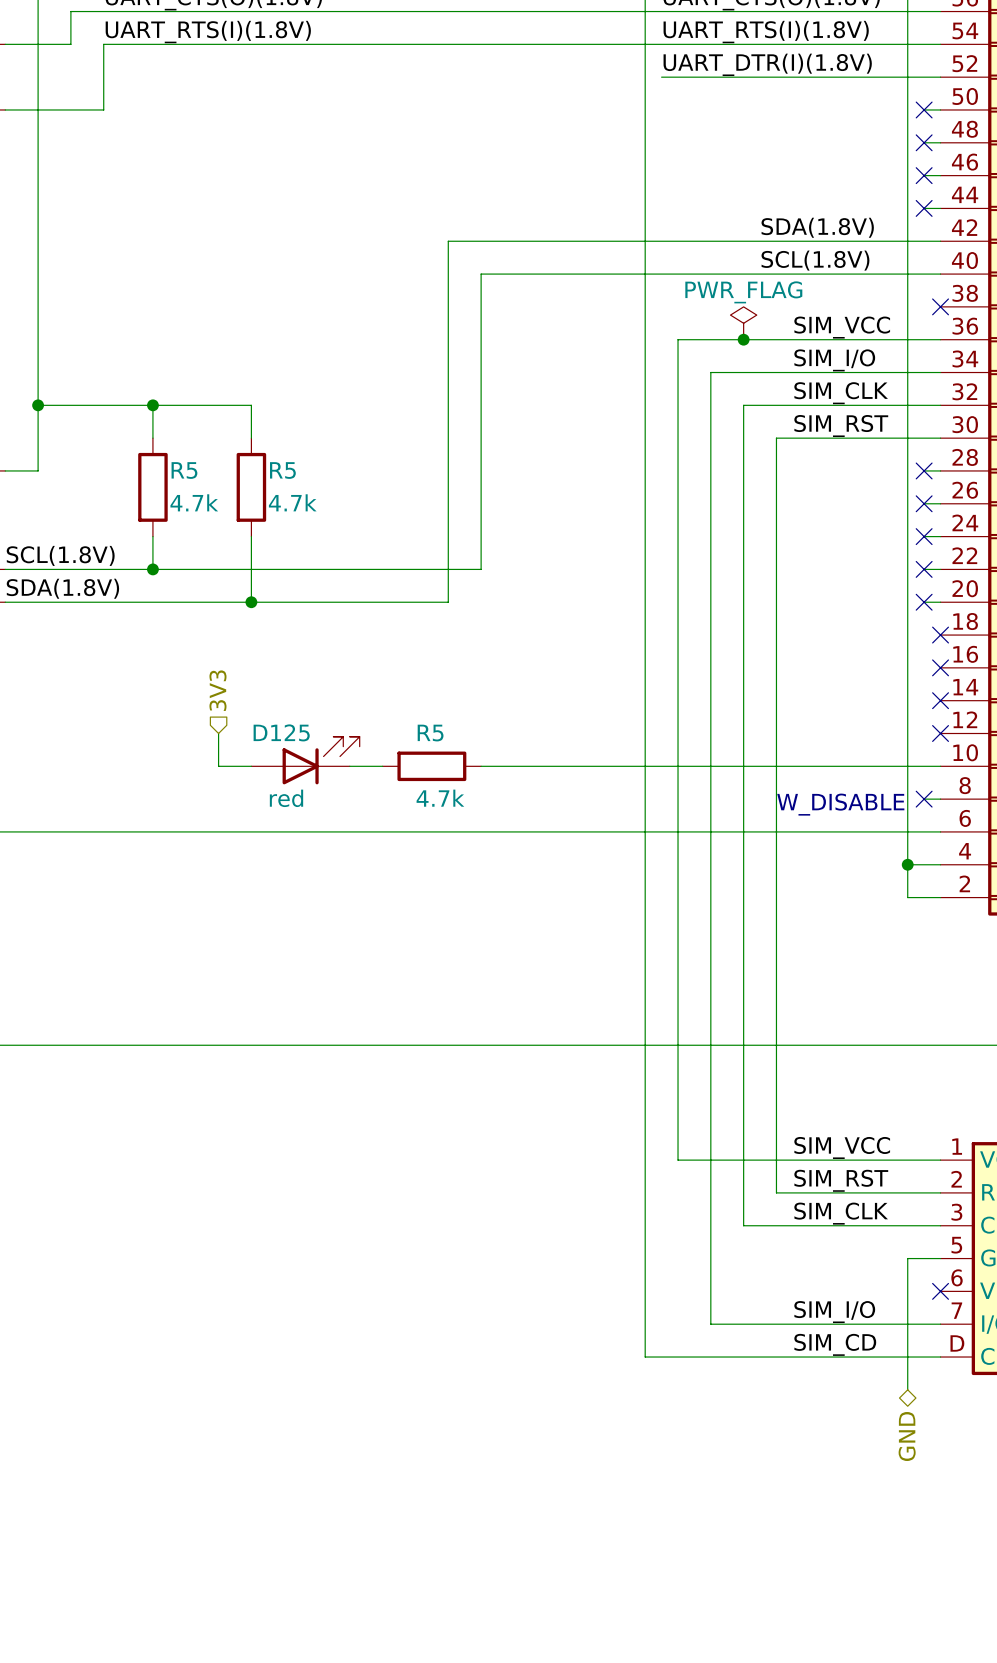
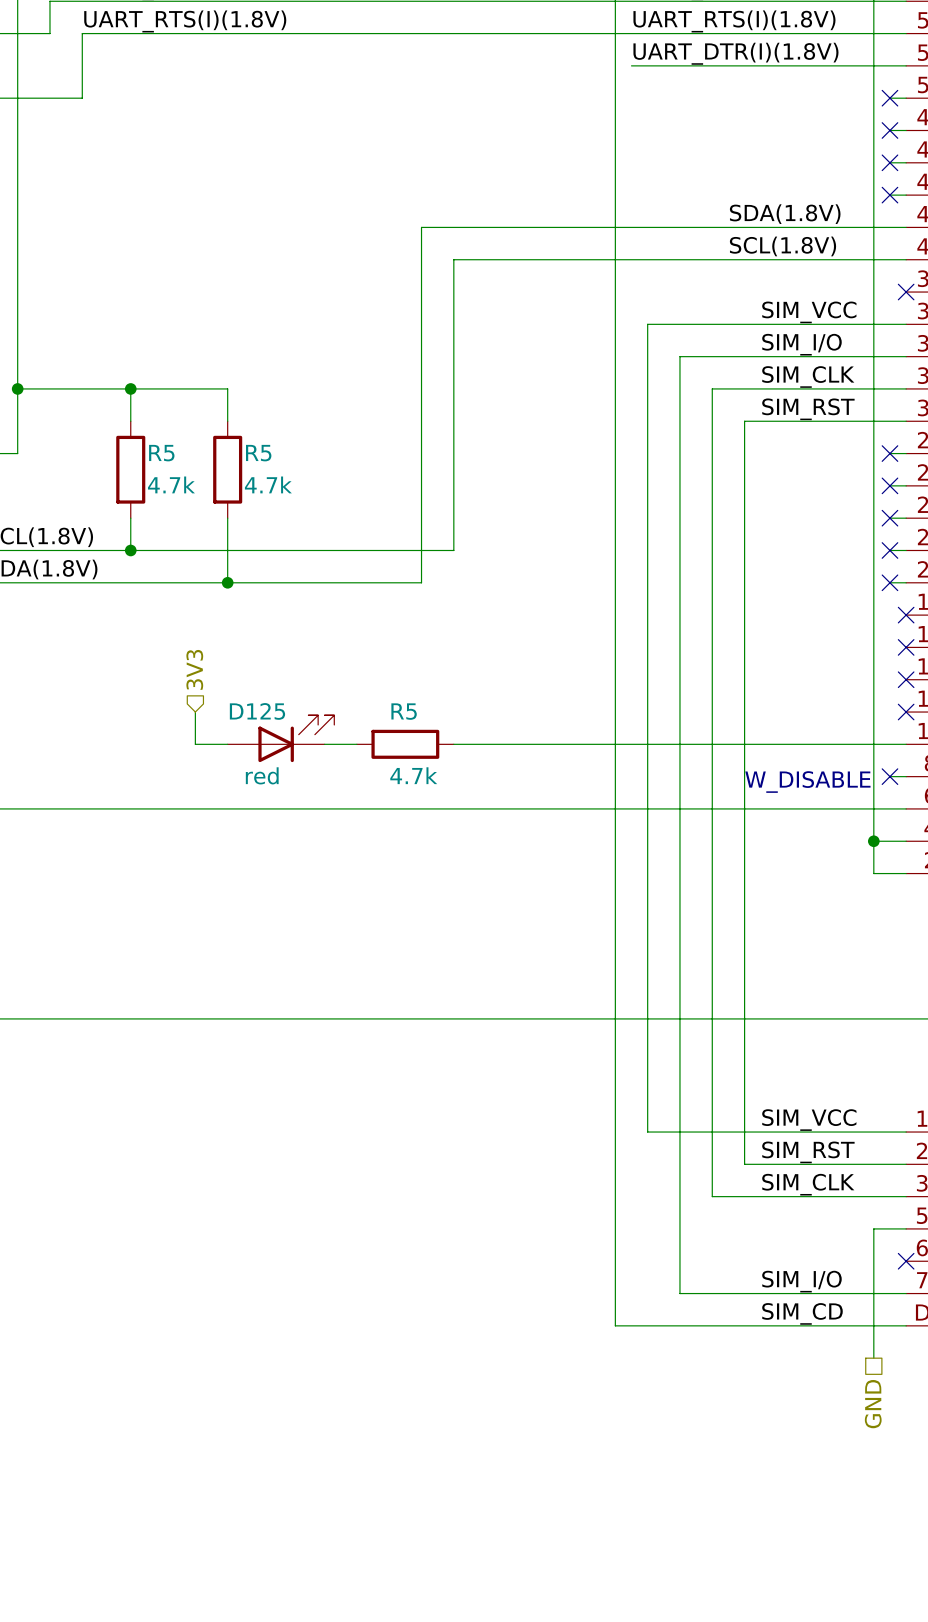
power symbol: PWR_FLAG (743, 323) -> none
junction: (743, 339) -> none
hierarchical label shape: bidirectional (907, 1436) -> passive (873, 1404)

